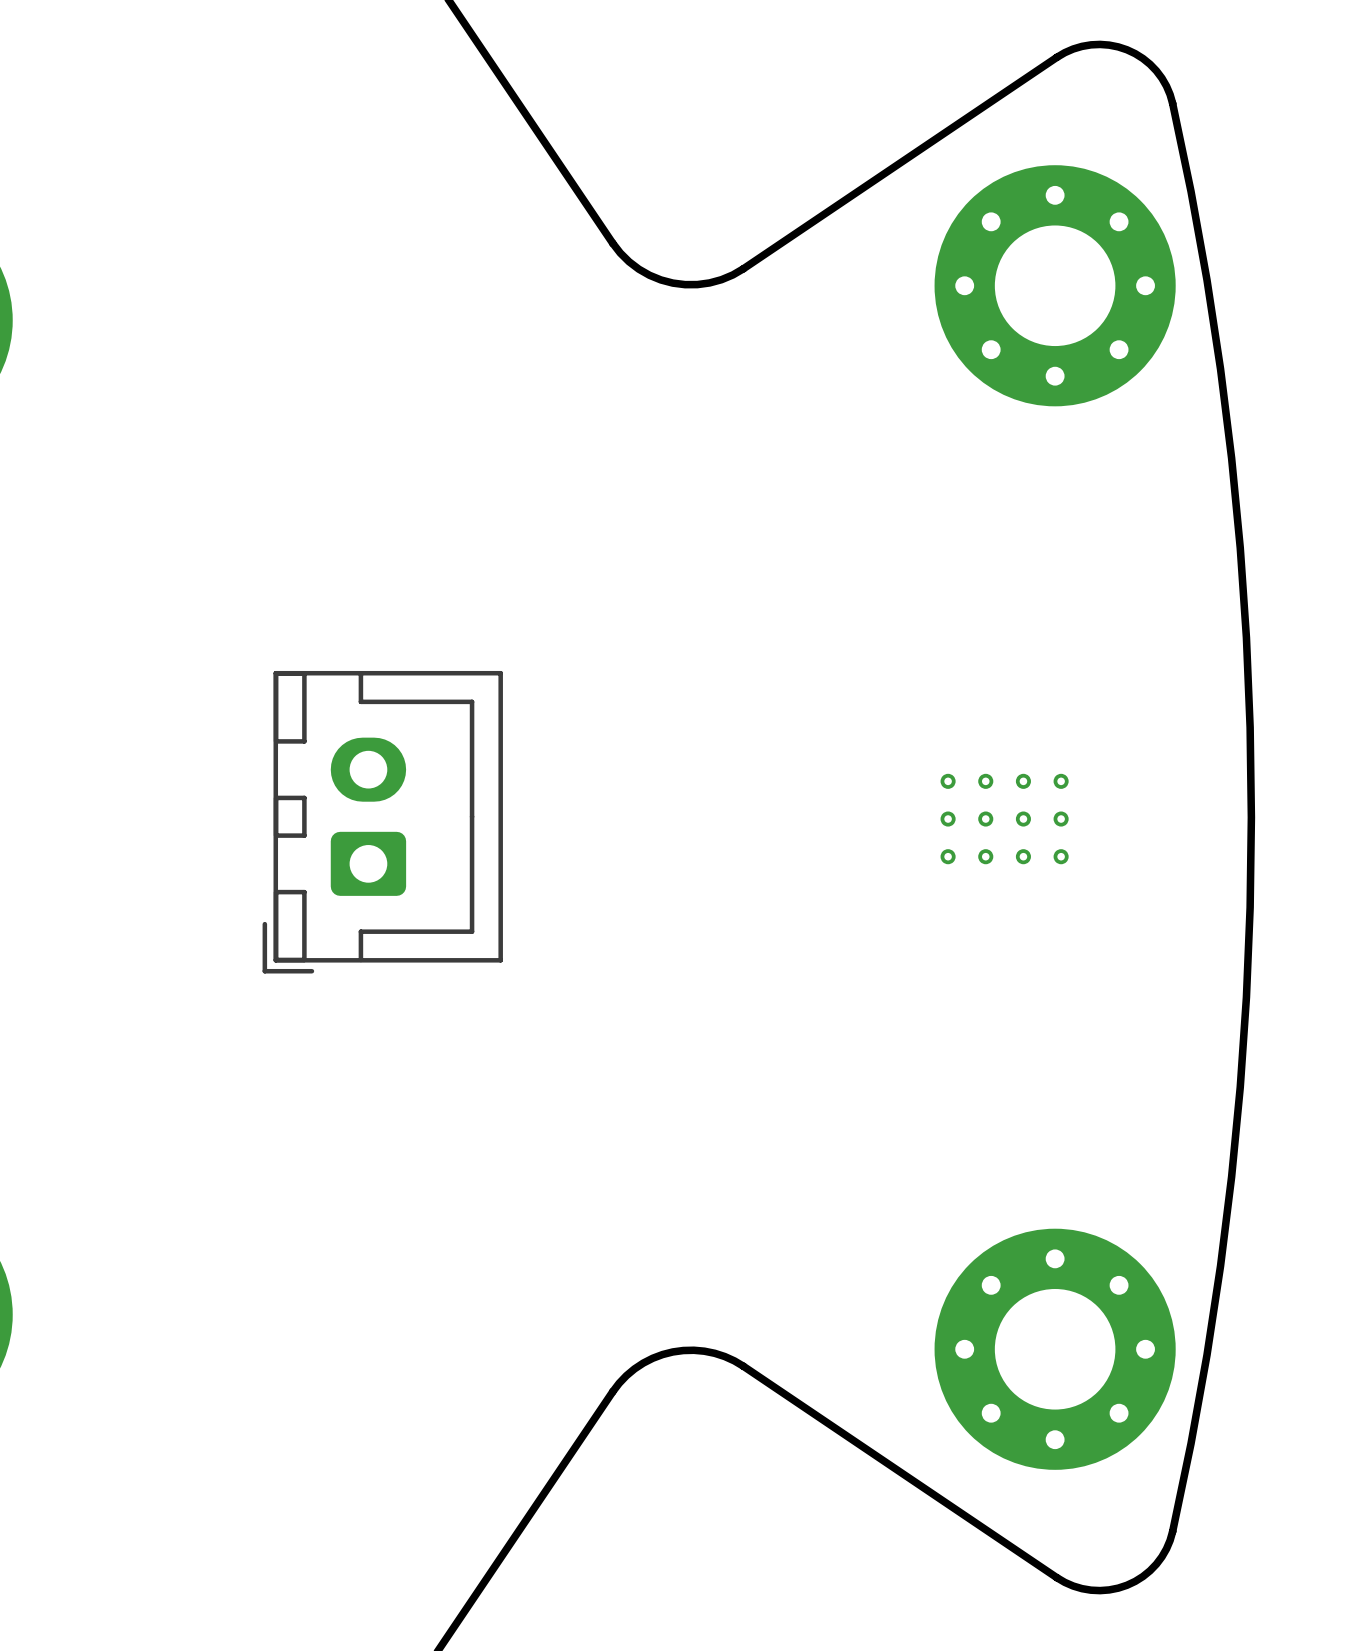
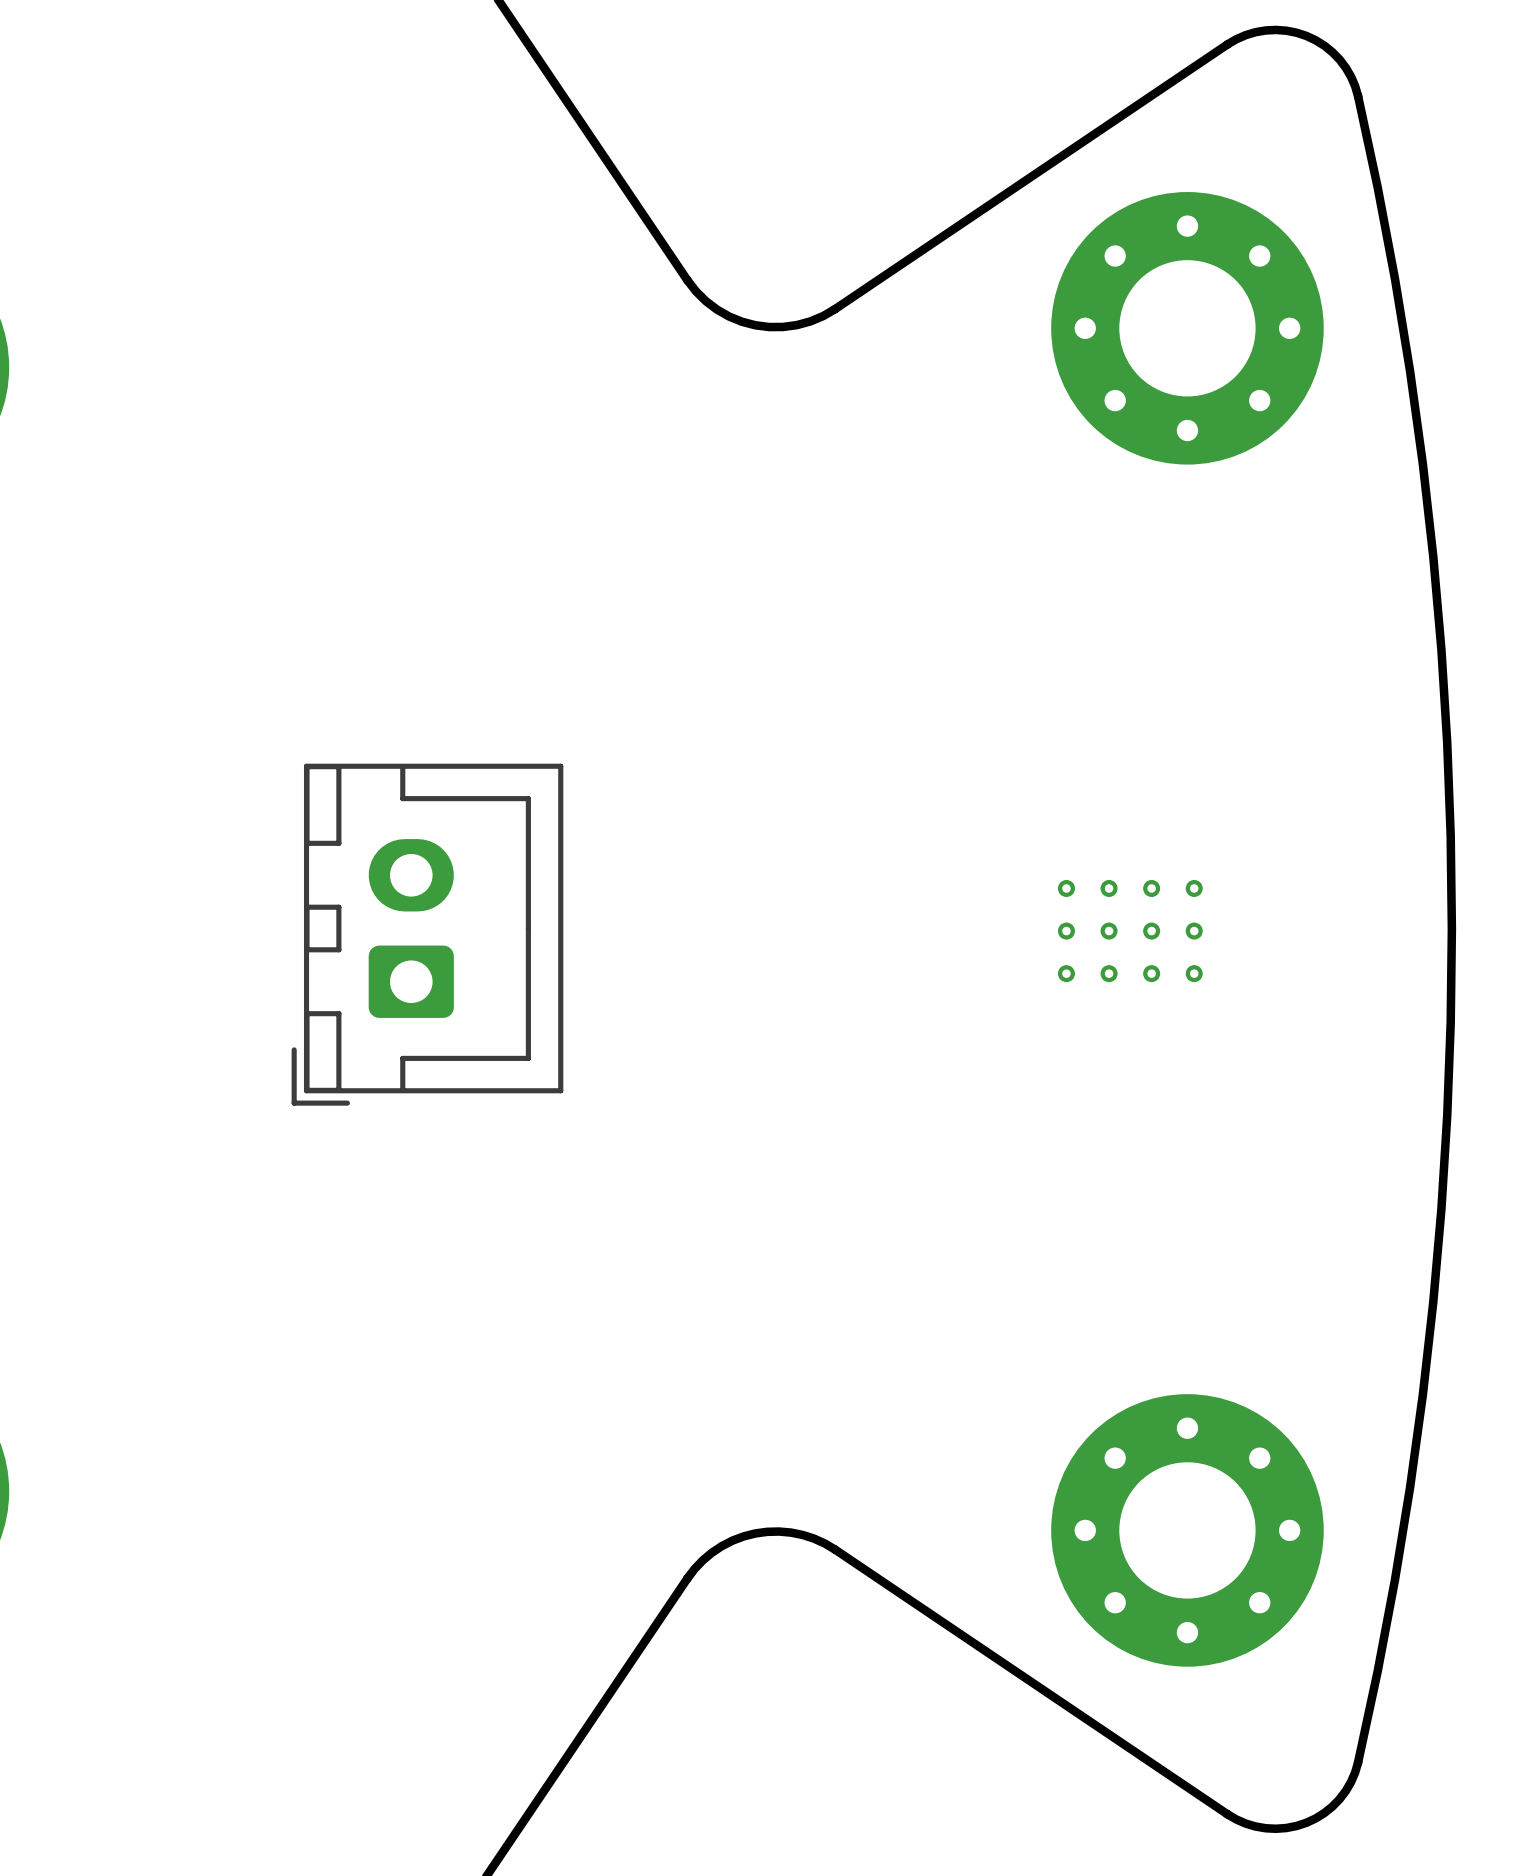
board edge: (1056, 57) (1073, 49) (1091, 44) (1109, 45) (1126, 49) (1142, 58) (1156, 70) (1166, 86) (1172, 103) (1207, 280) (1231, 458) (1246, 637) (1251, 817) (1246, 997) (1231, 1176) (1207, 1355) (1172, 1531) (1166, 1548) (1156, 1564) (1142, 1576) (1126, 1585) (1109, 1589) (1091, 1590) (1073, 1586) (1056, 1577) -> (1189, 70) (1227, 44) (1245, 35) (1265, 30) (1286, 30) (1306, 35) (1332, 52) (1345, 67) (1355, 86) (1377, 187) (1395, 279) (1422, 463) (1441, 649) (1447, 742) (1451, 929) (1447, 1115) (1433, 1302) (1422, 1394) (1395, 1579) (1377, 1671) (1355, 1772) (1345, 1790) (1324, 1812) (1306, 1822) (1286, 1828) (1265, 1828) (1245, 1823) (1227, 1814) (1189, 1788)

